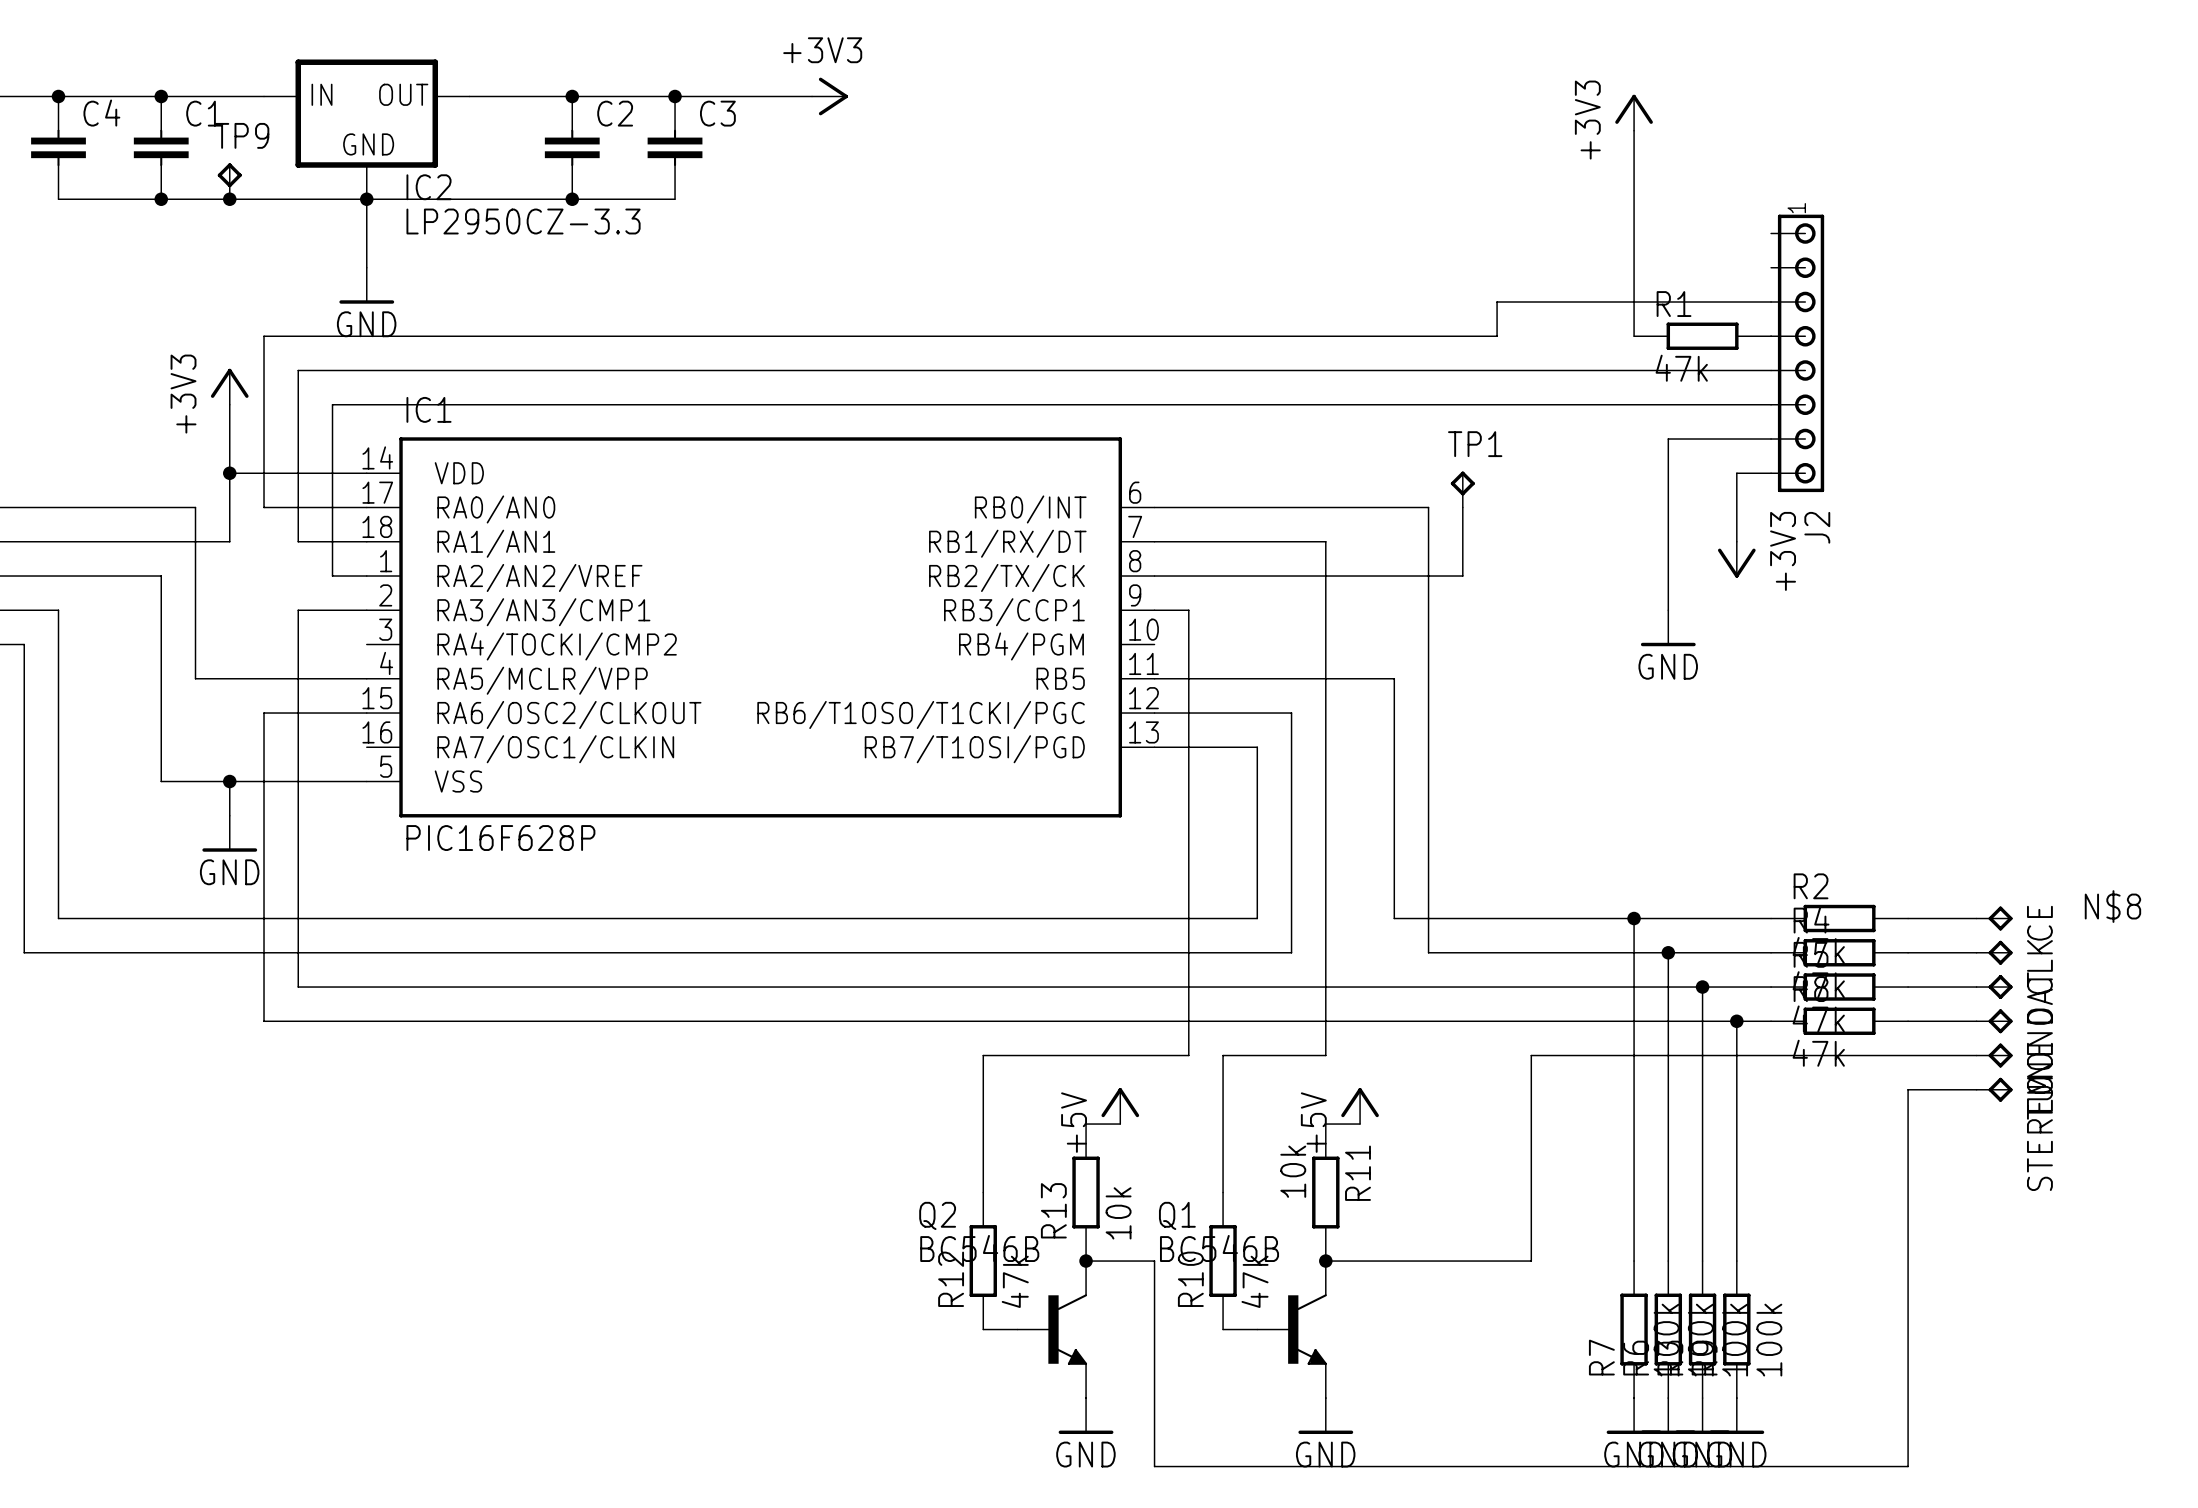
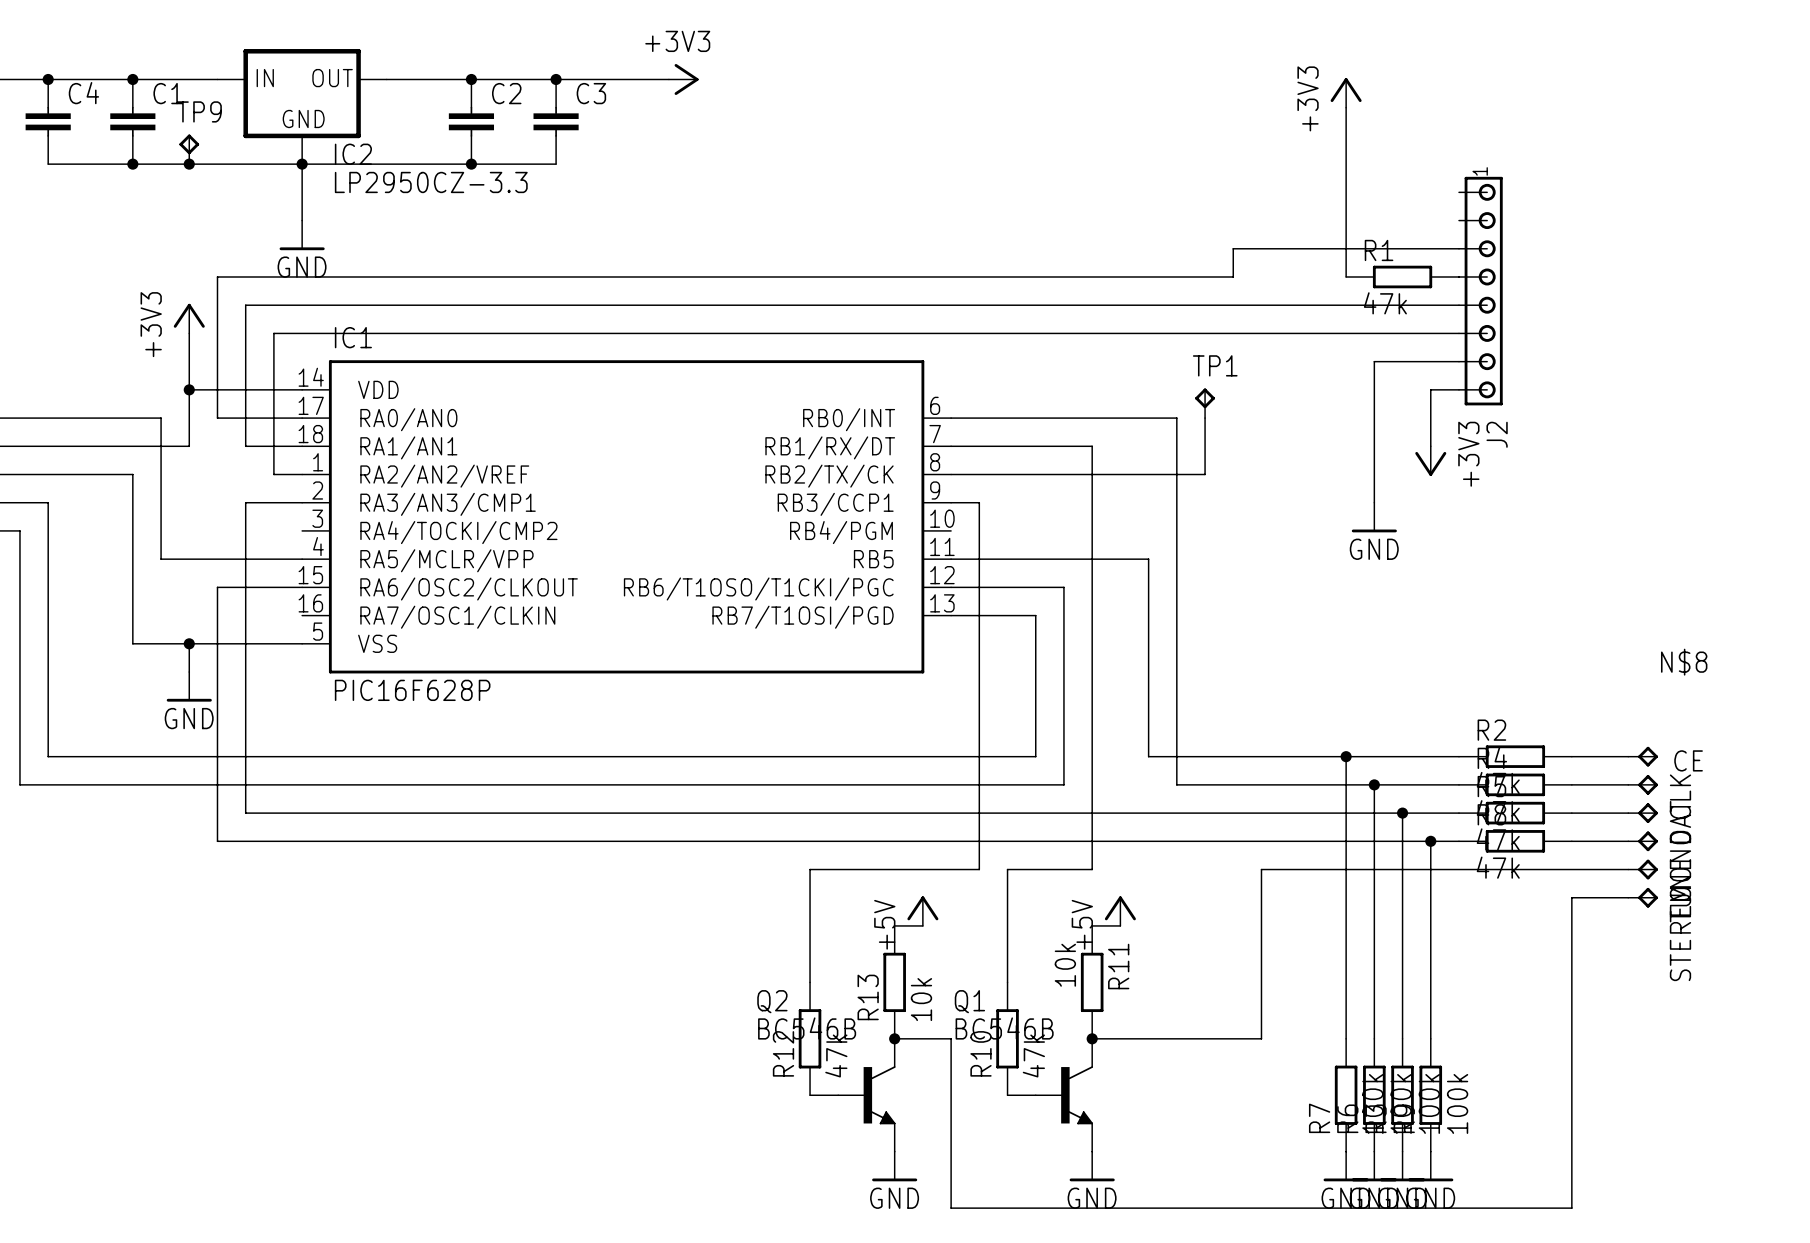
label position: N$8 (2112, 906) -> N$8 (1684, 662)
CE name rotation: 0° (2039, 923) -> 90° clockwise (1688, 760)

